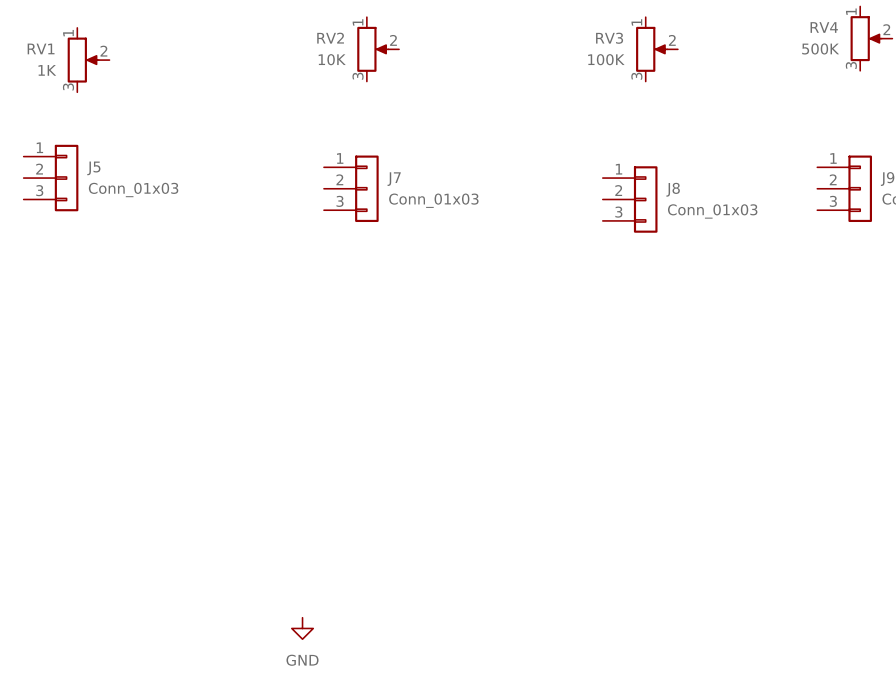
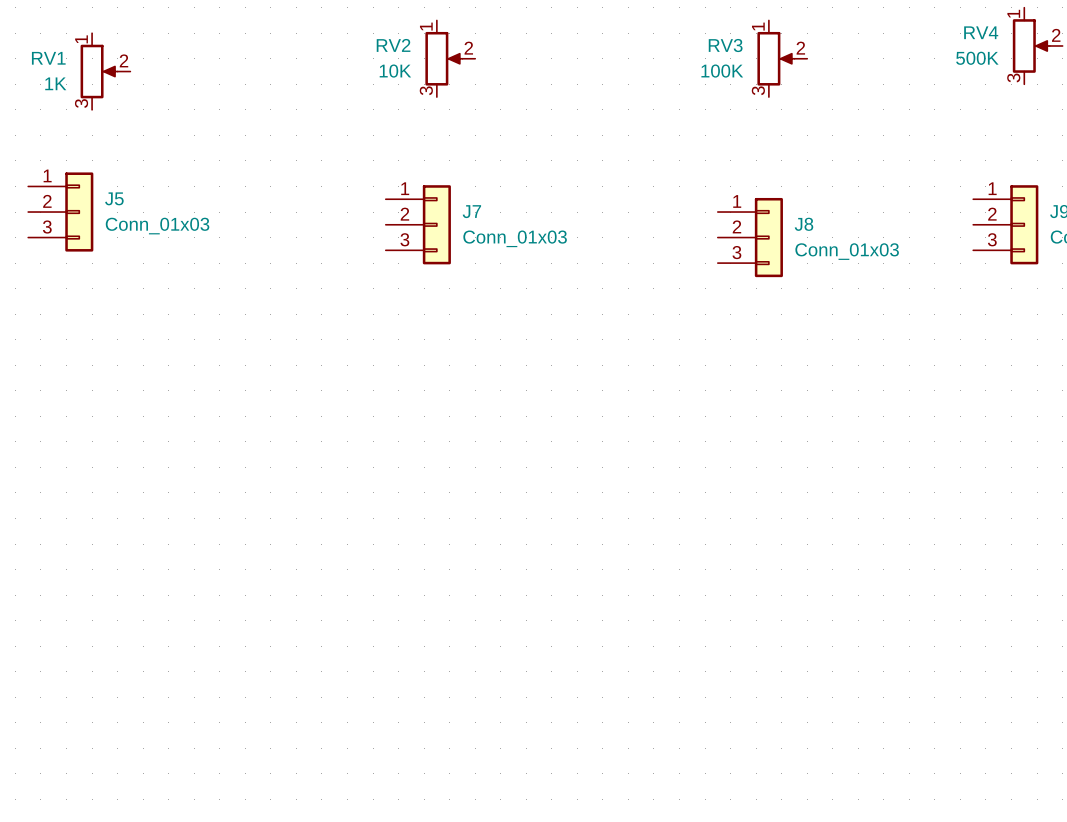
power symbol: GND (302, 628) -> none

